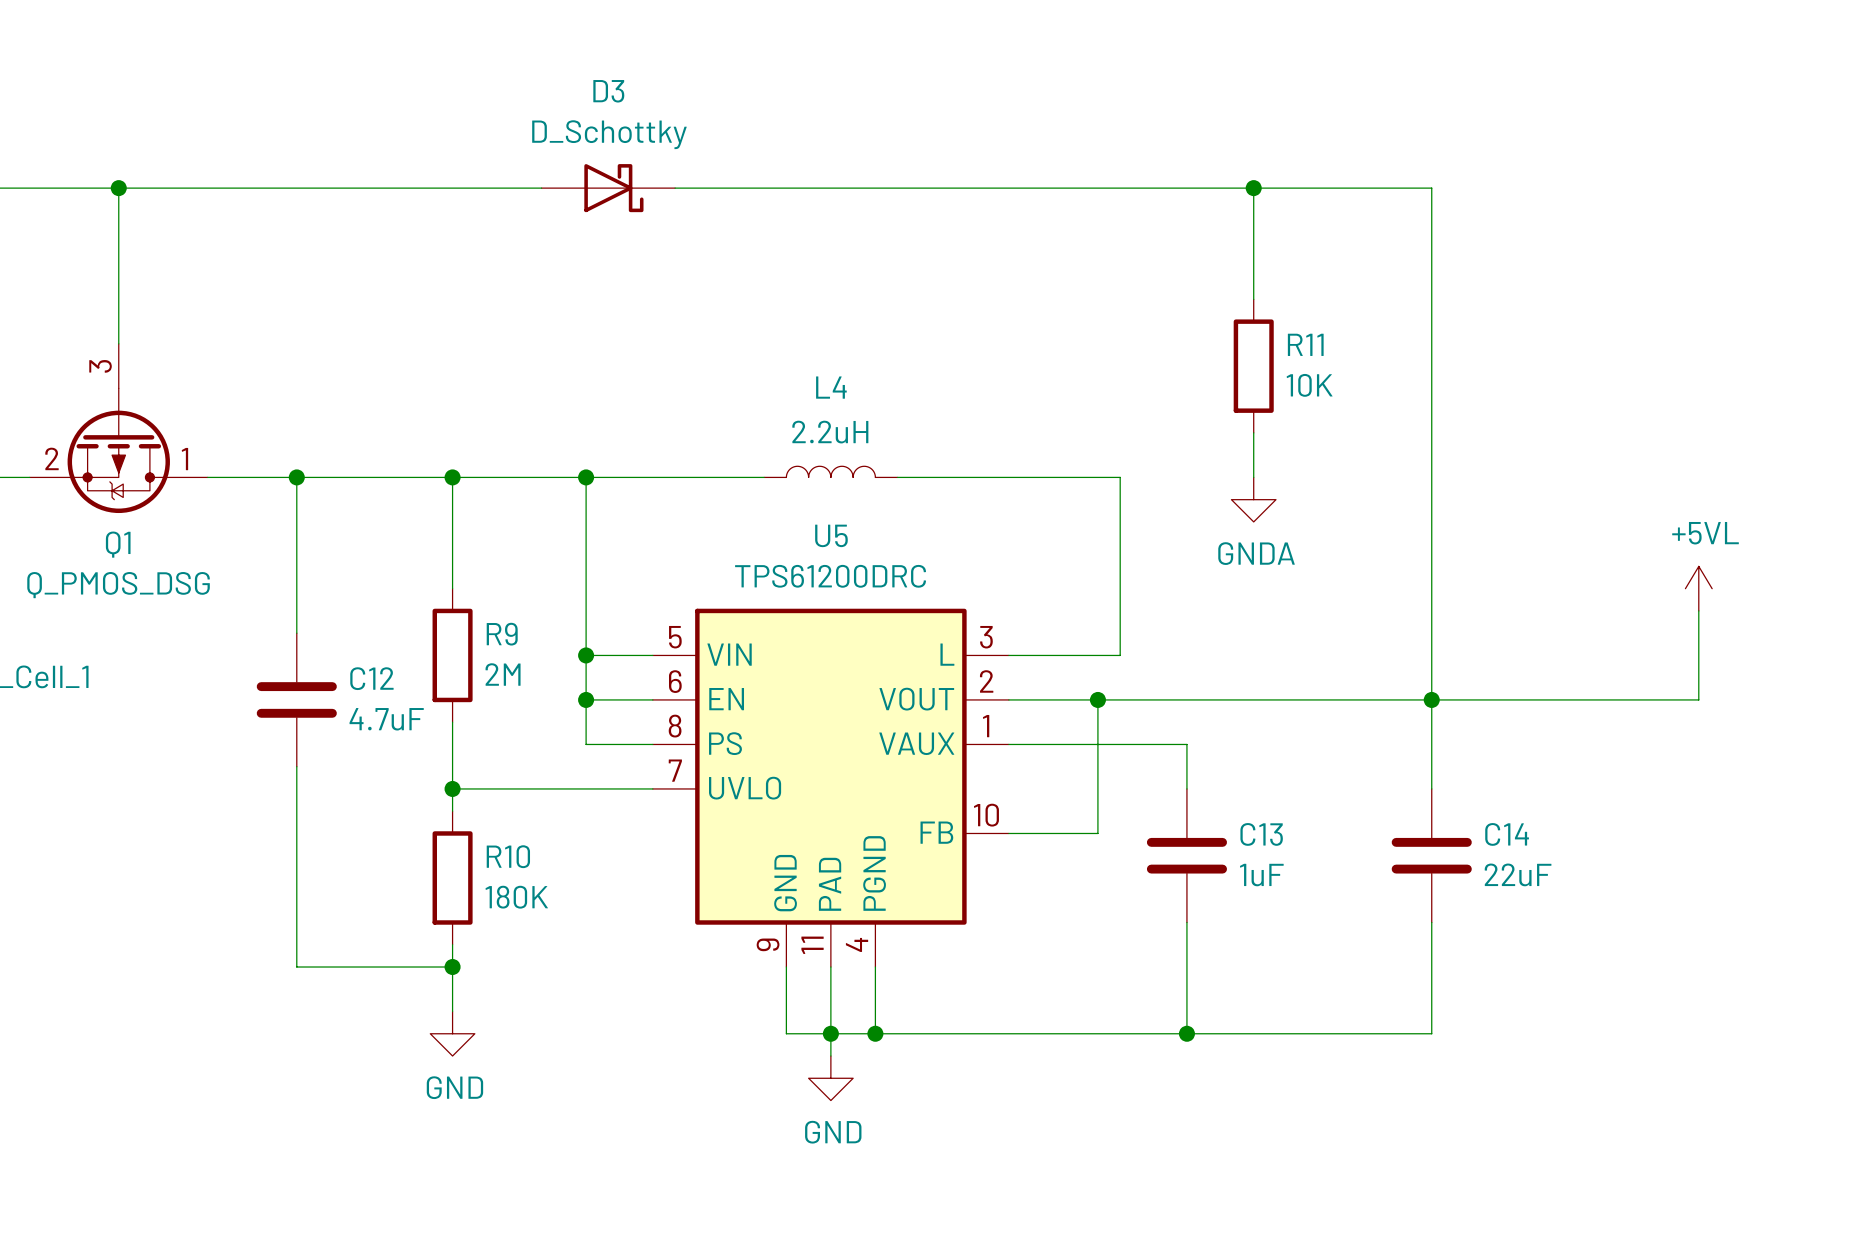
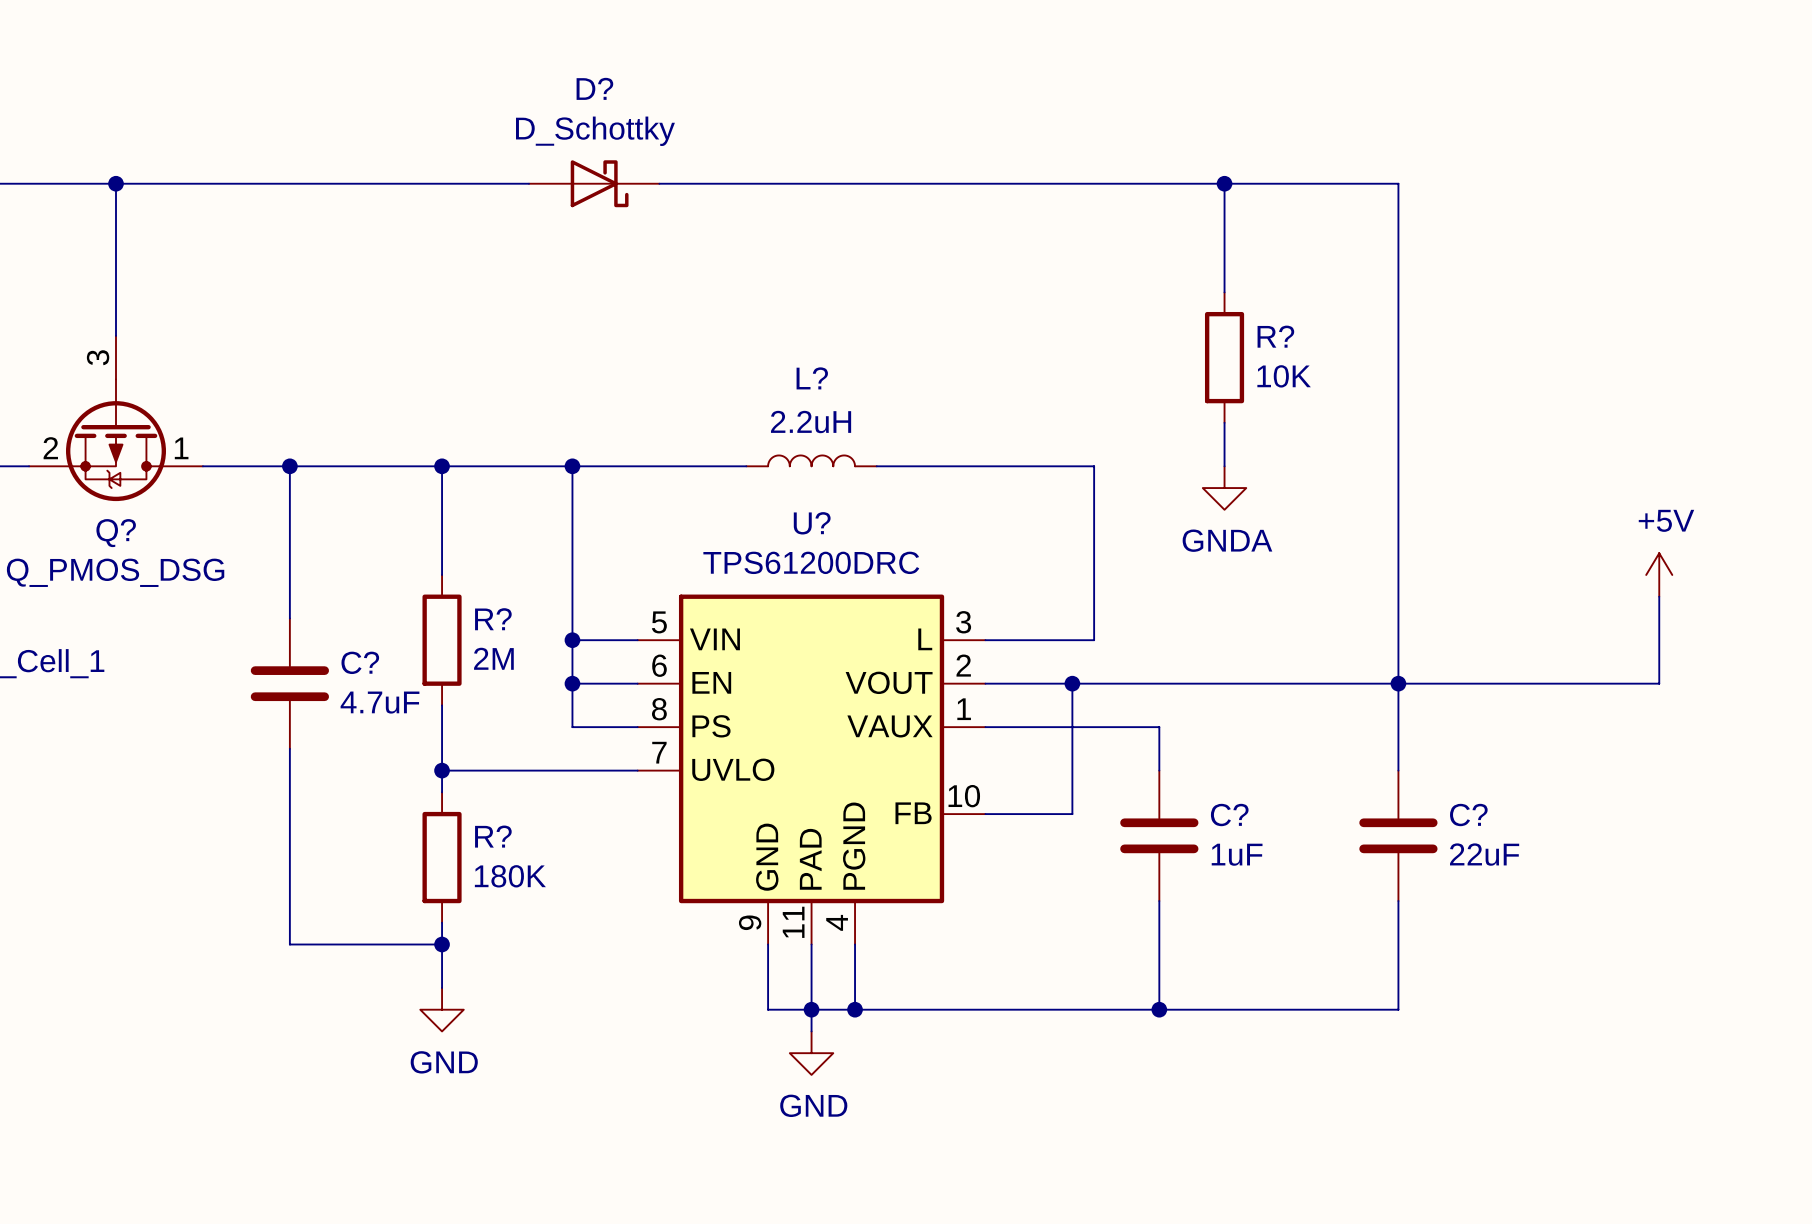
D3 name: D3 (608, 91) -> D? (594, 88)
R11 name: R11 (1305, 344) -> R? (1275, 336)
L4 name: L4 (831, 387) -> L? (812, 378)
U5 name: U5 (831, 535) -> U? (812, 523)
Q1 name: Q1 (118, 544) -> Q? (116, 533)
power symbol: +5VL (1698, 588) -> +5V (1659, 574)
R9 name: R9 (502, 634) -> R? (493, 619)
C12 name: C12 (371, 678) -> C? (360, 662)
C13 name: C13 (1261, 834) -> C? (1229, 815)
C14 name: C14 (1507, 834) -> C? (1468, 815)
R10 name: R10 (508, 856) -> R? (493, 836)

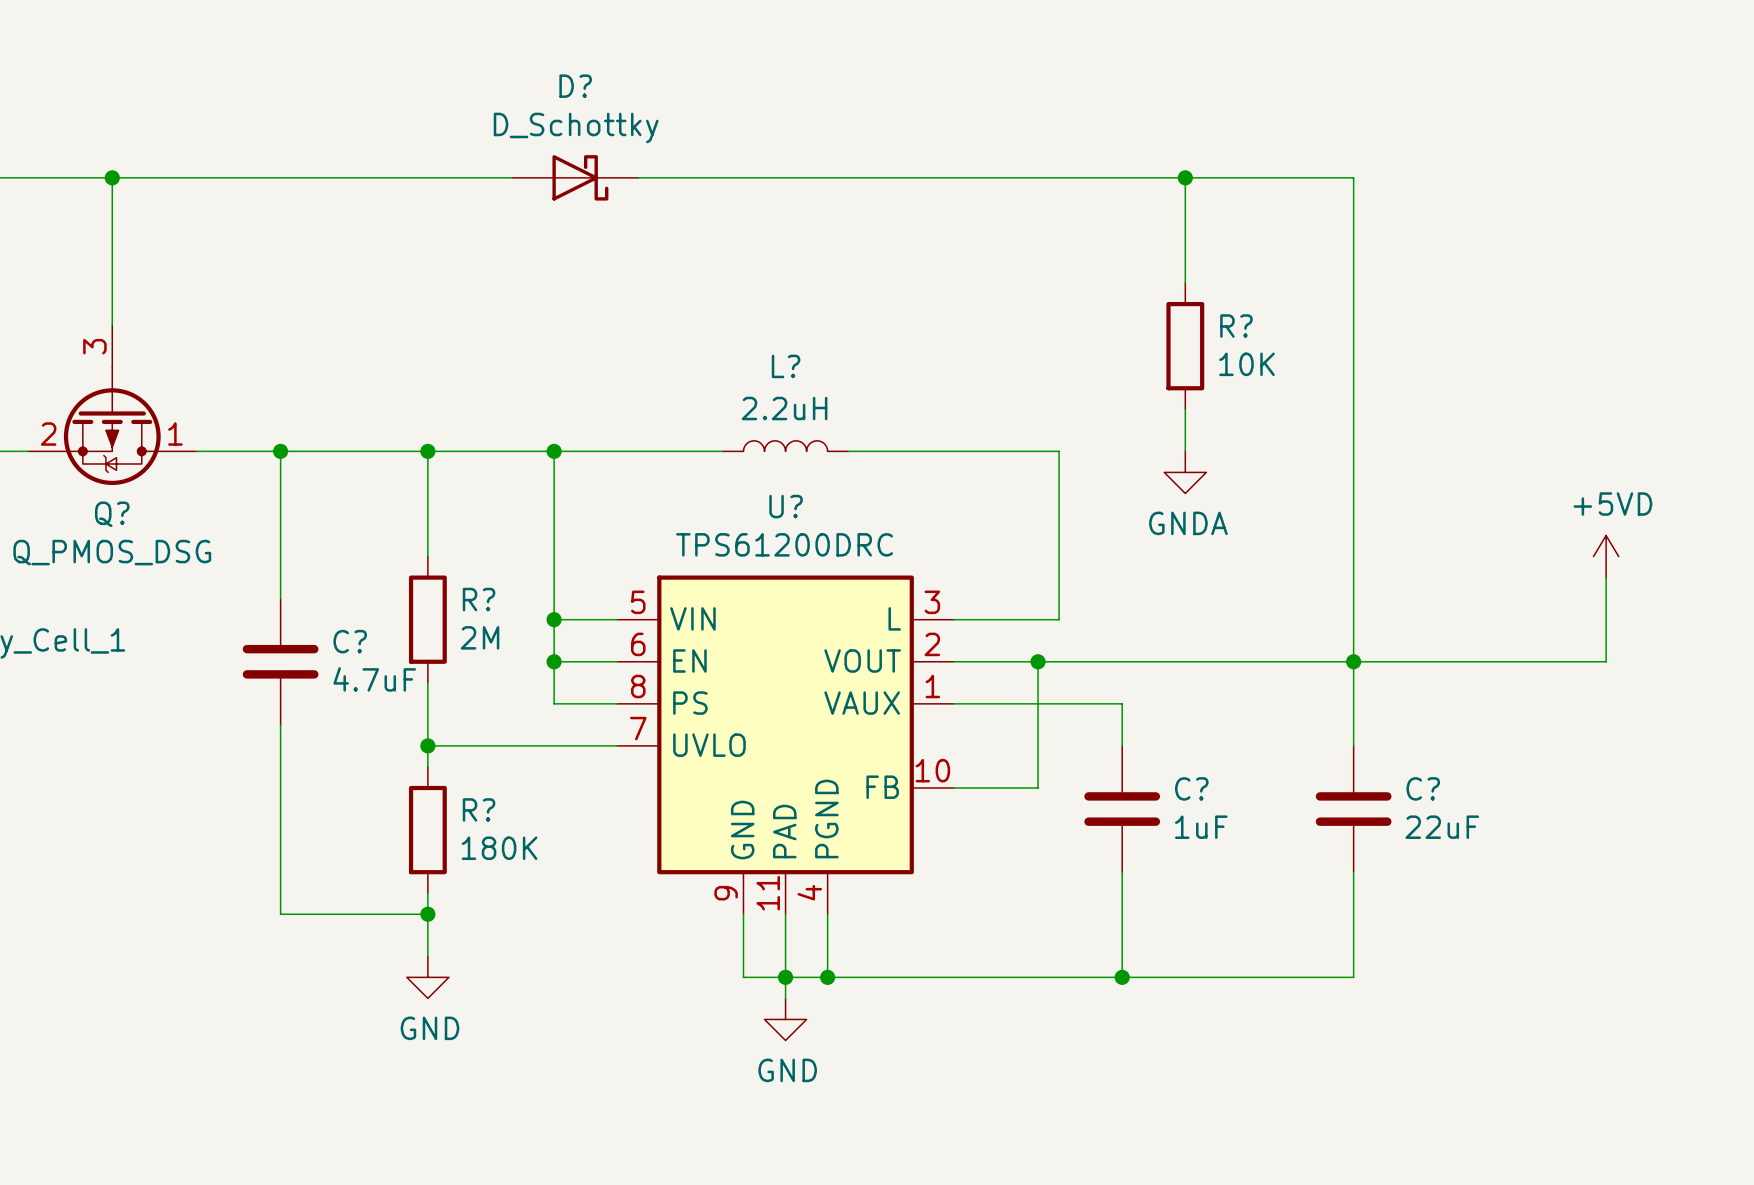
power symbol: +5V (1659, 574) -> +5VD (1606, 556)

